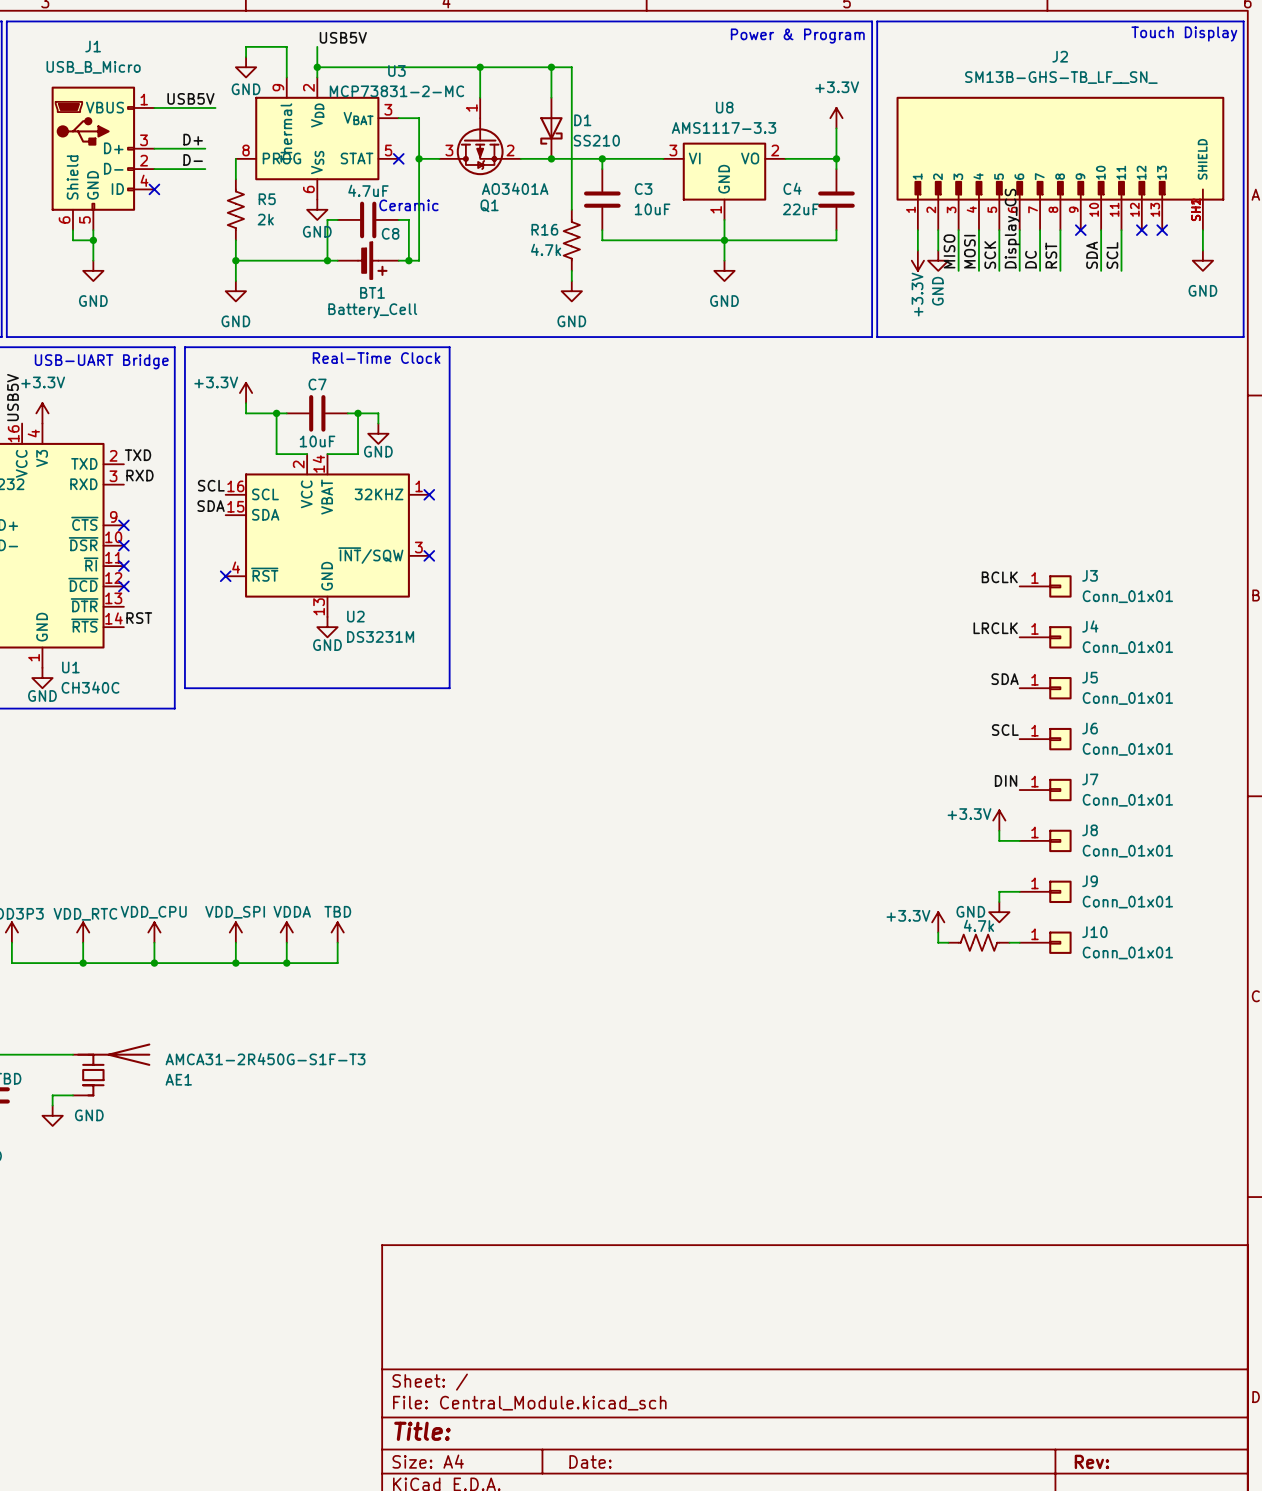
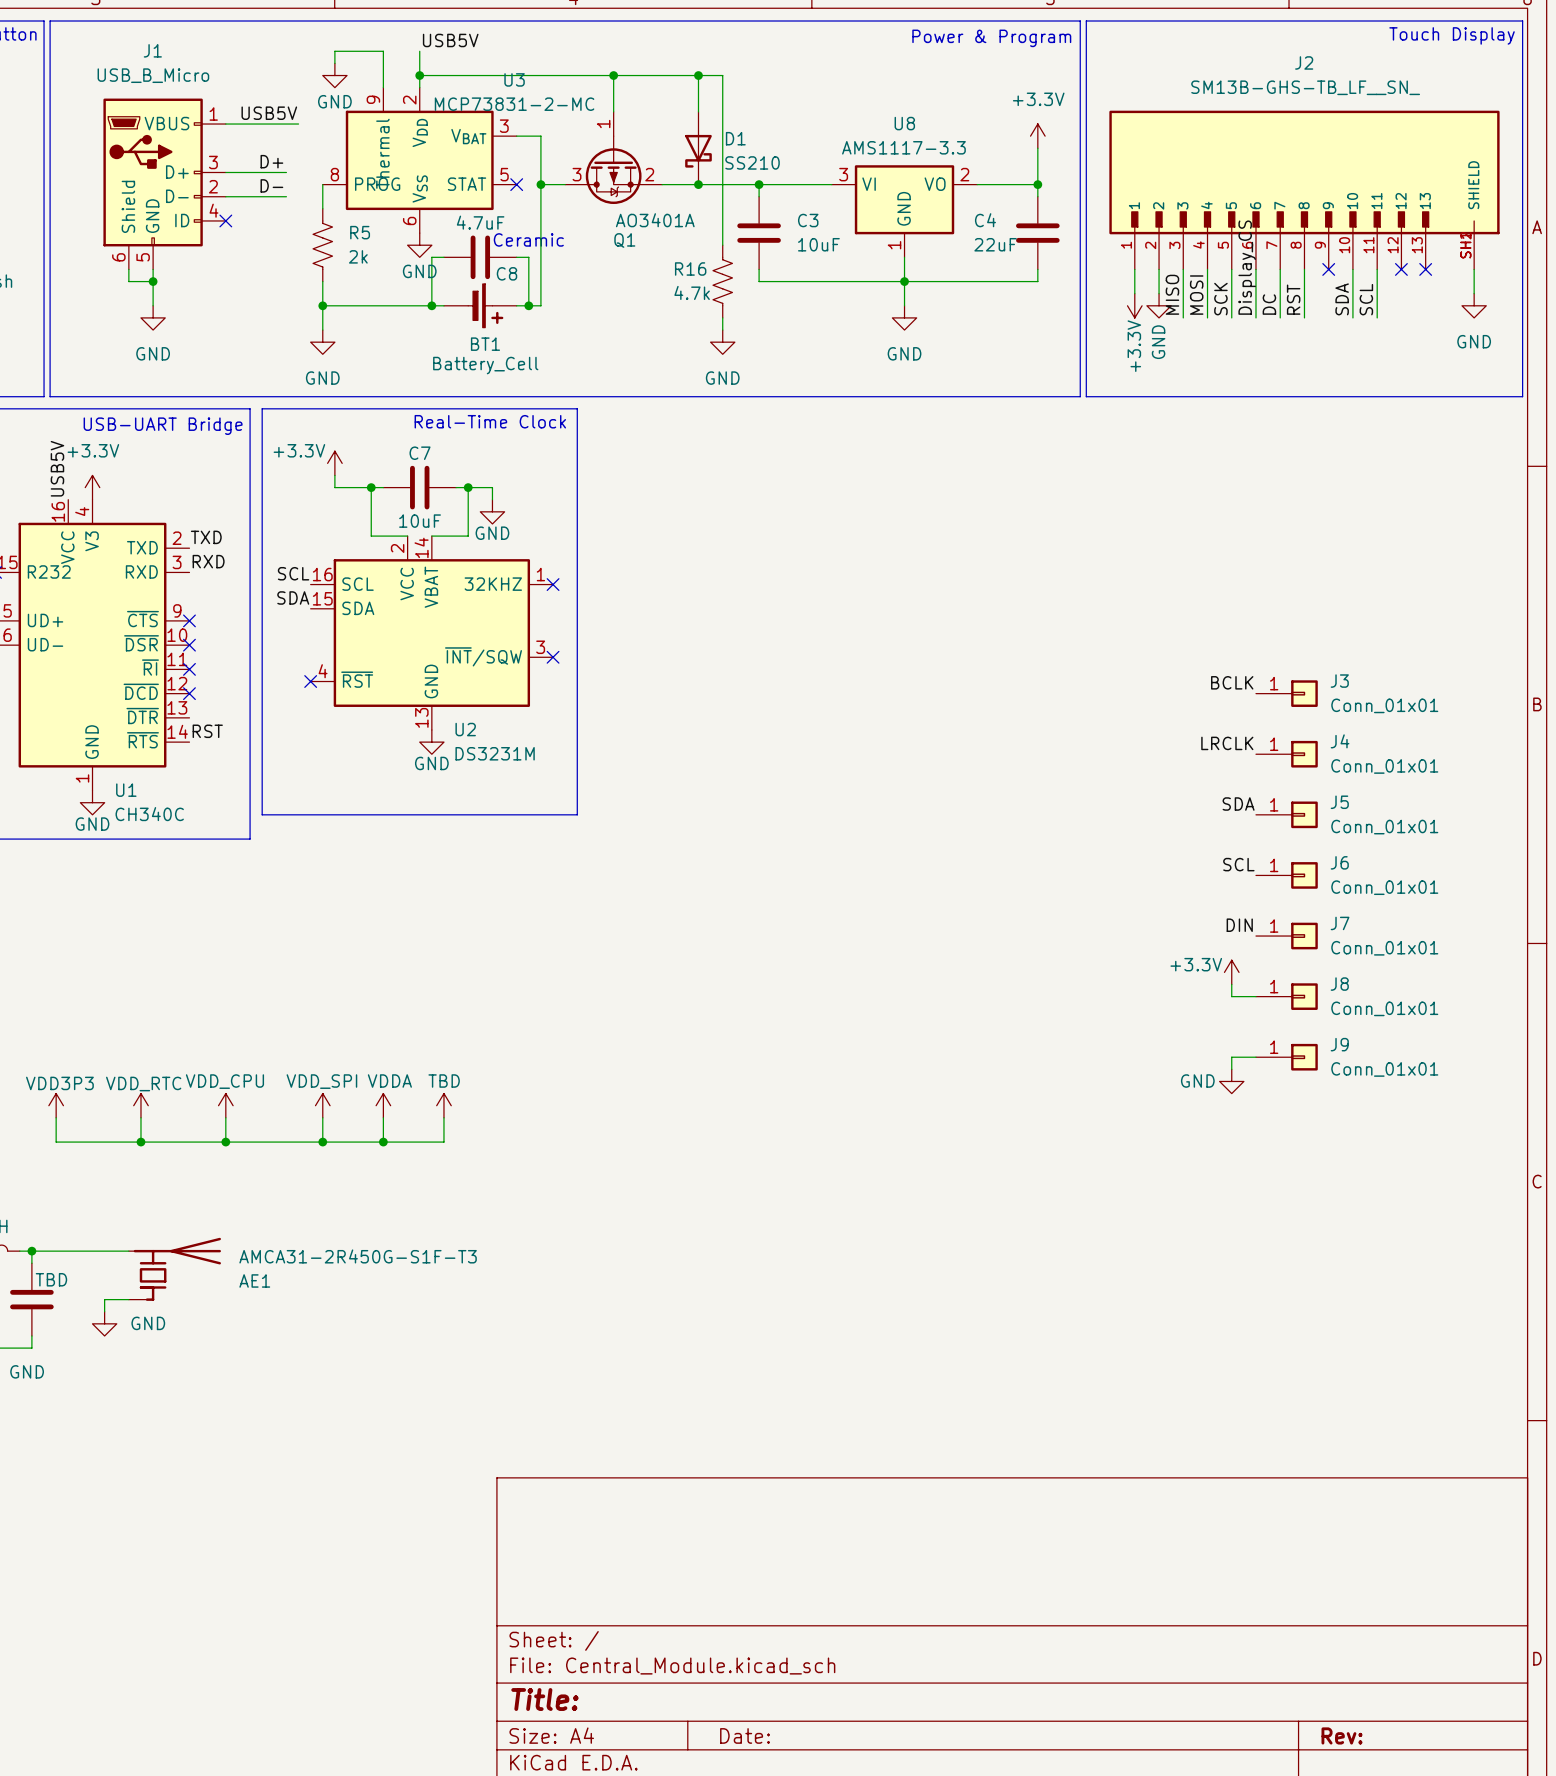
power symbol: +3.3V (938, 922) -> none
wire: (938, 932) (938, 942) (948, 942) -> none
part: 4.7k (978, 942) -> none
wire: (1009, 942) (1019, 942) -> none
J10: Conn_01x01 (1045, 942) -> none

